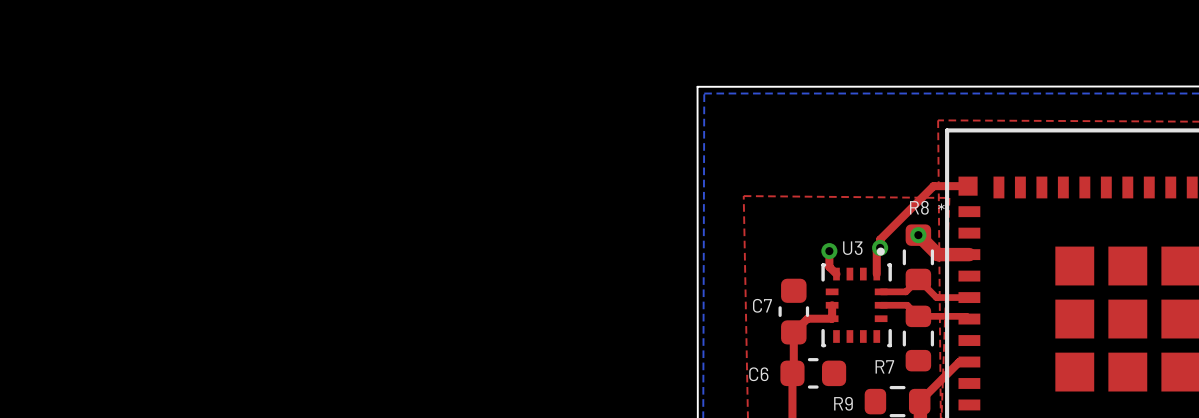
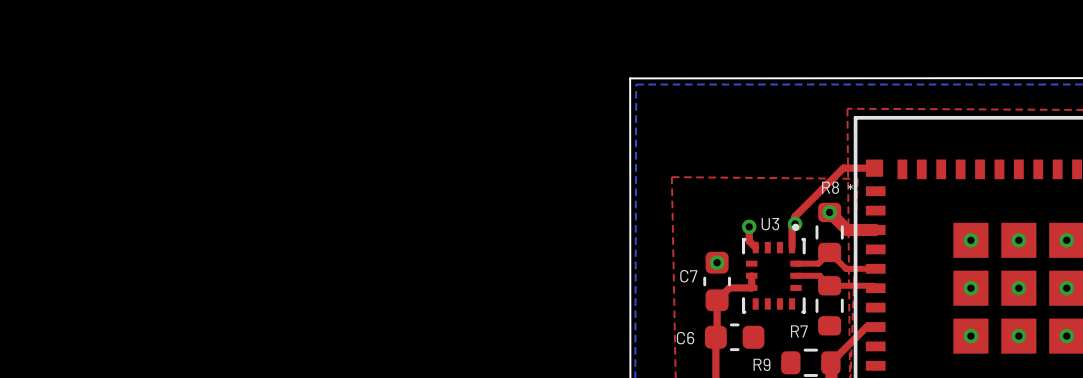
via: none -> (970, 240)
via: none -> (1018, 240)
via: none -> (1066, 240)
via: none -> (717, 262)
via: none -> (970, 288)
via: none -> (1018, 288)
via: none -> (1066, 288)
via: none -> (970, 336)
via: none -> (1018, 336)
via: none -> (1066, 336)

